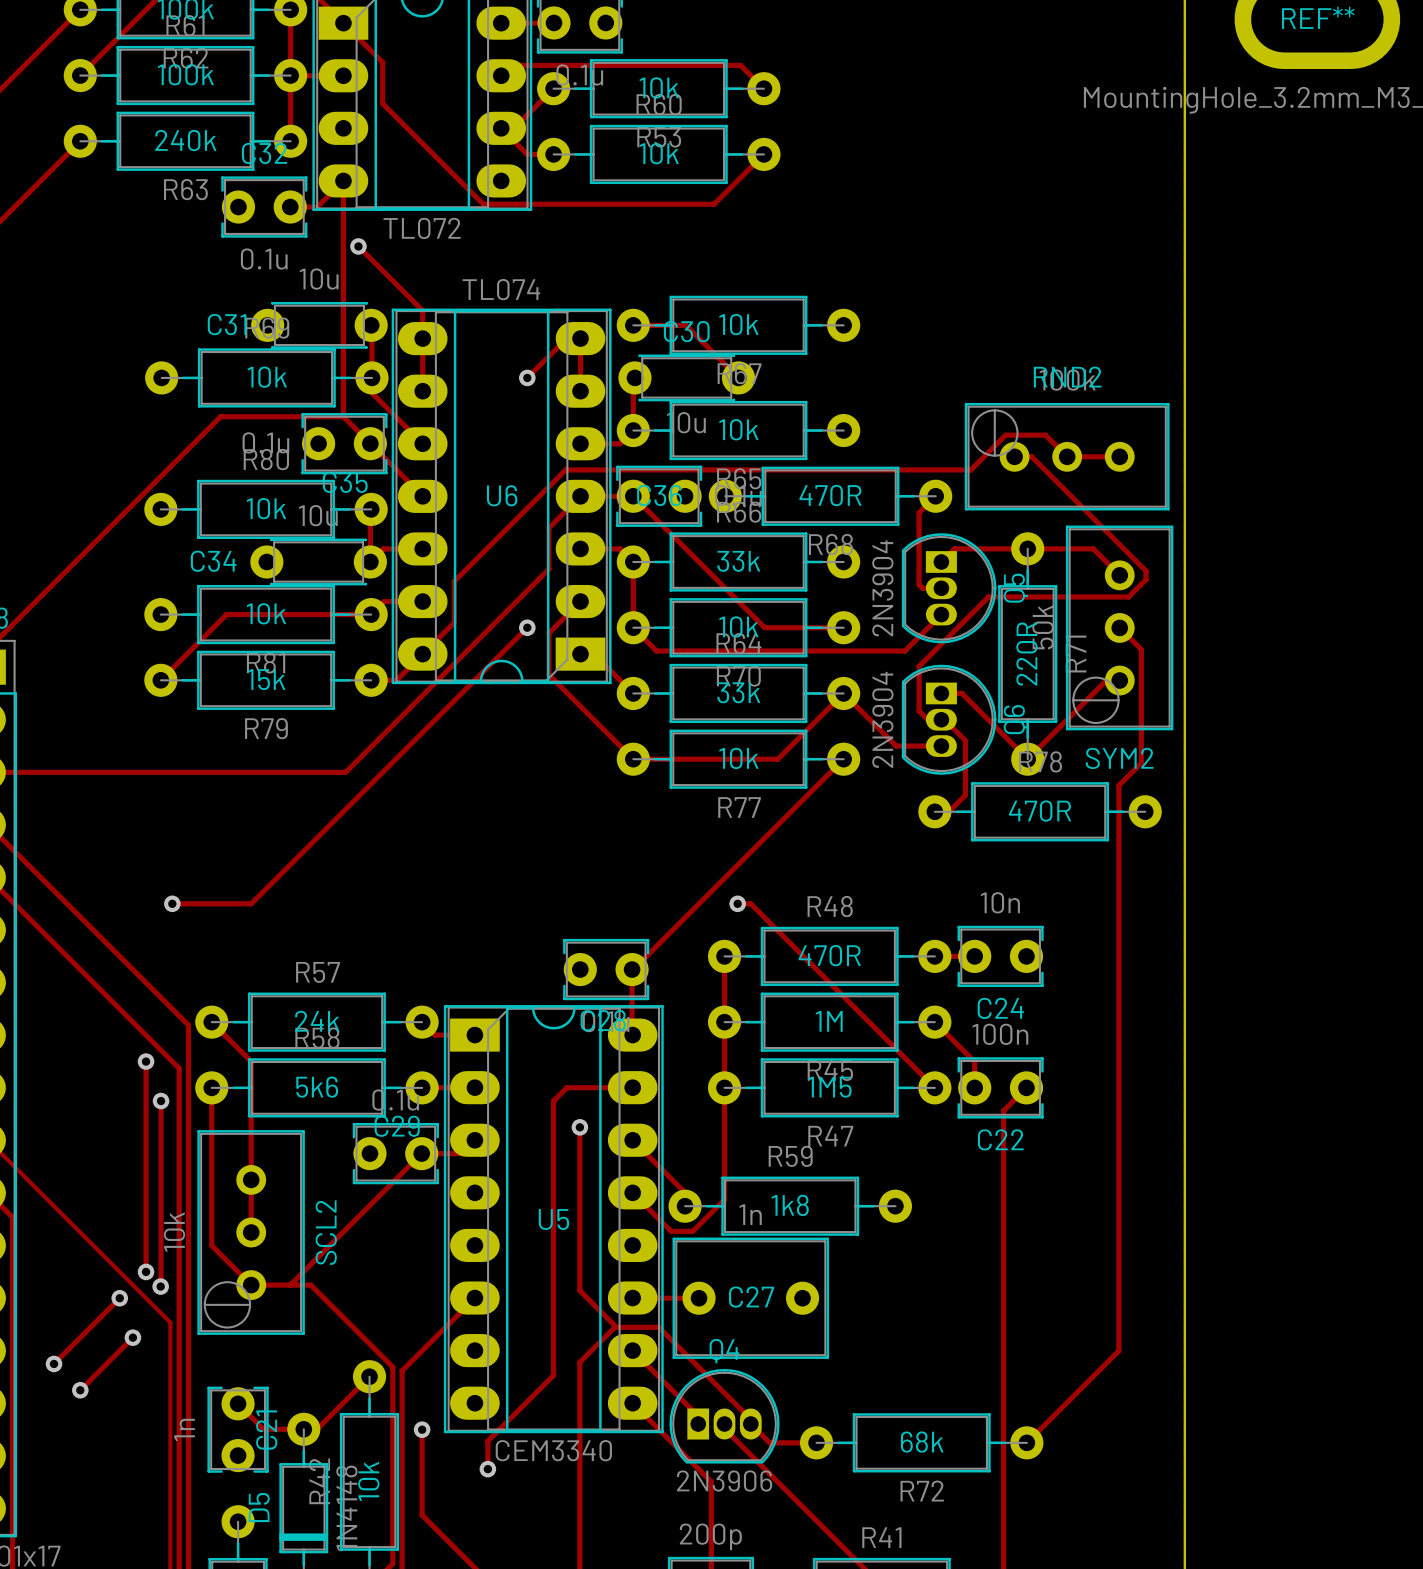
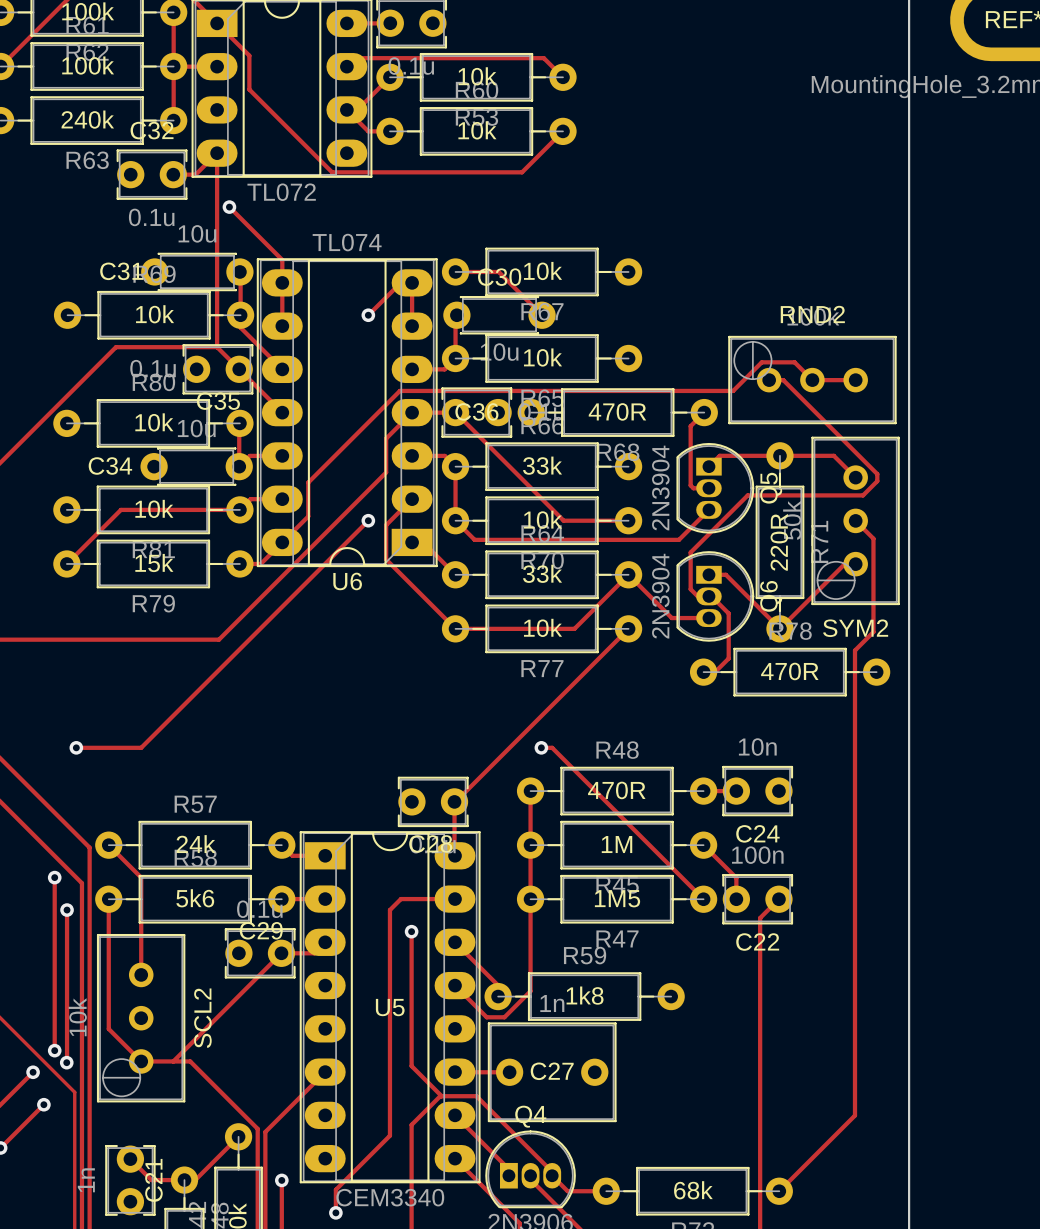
U6 name position: U6 (502, 495) -> U6 (347, 581)
track: (251, 1179) (251, 1232) -> none

